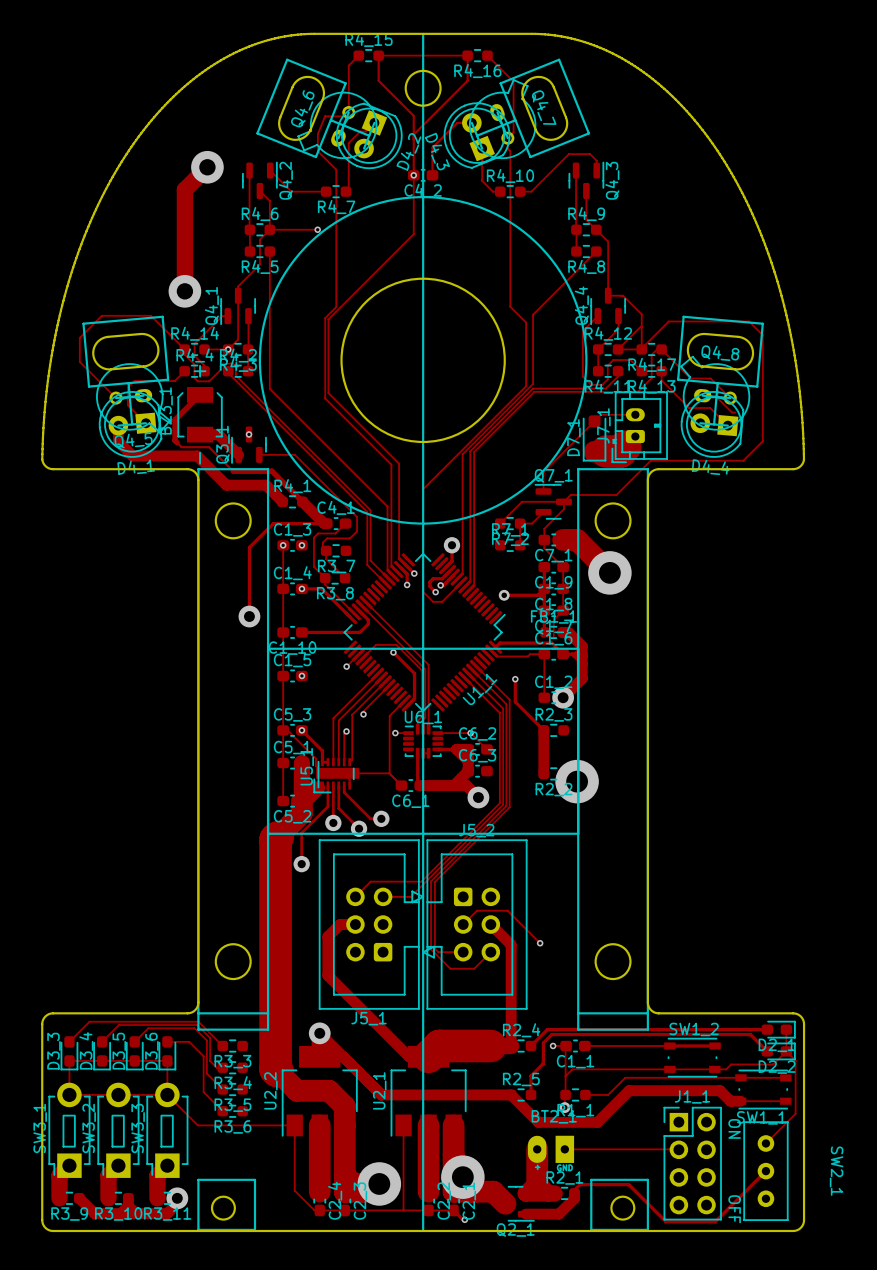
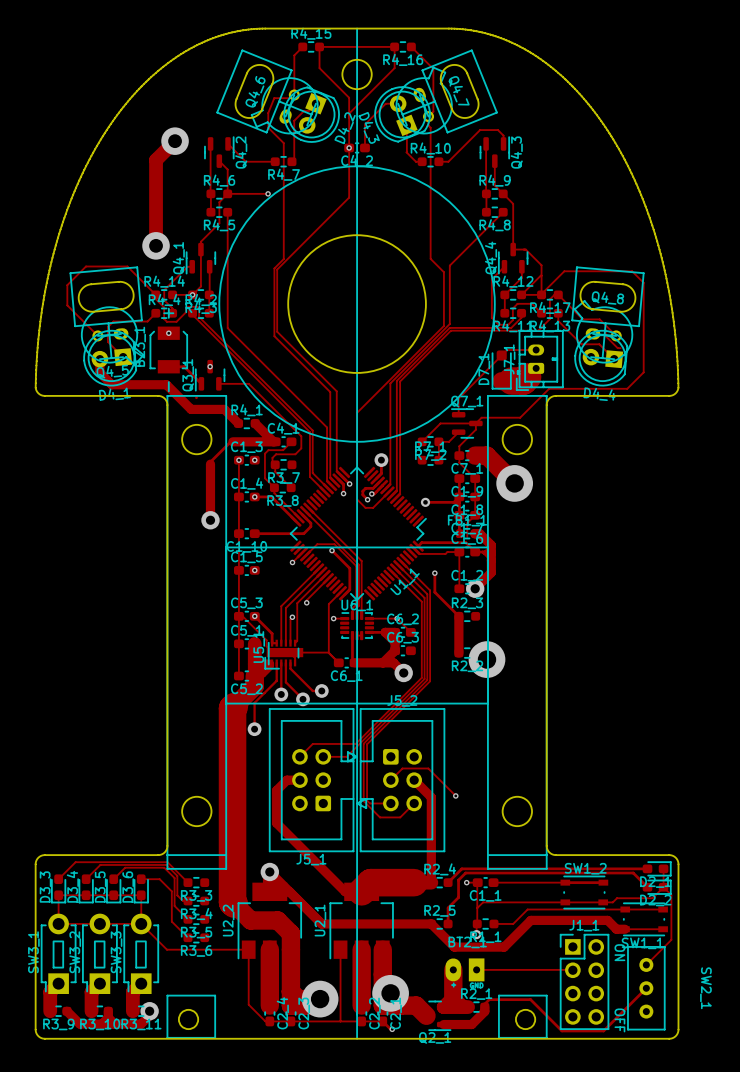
track: (200, 394) (175, 419) (175, 440) (181, 447) (209, 447) (233, 471) (271, 471) (302, 501) -> none
via: none -> (168, 333)
track width: thick (200, 434) (218, 434) (238, 454) -> thin (168, 366) (184, 366) (201, 383)
track width: thin (275, 523) (324, 523) -> thick (232, 441) (273, 441)
track width: thin (249, 550) (249, 616) -> thick (210, 464) (210, 520)

